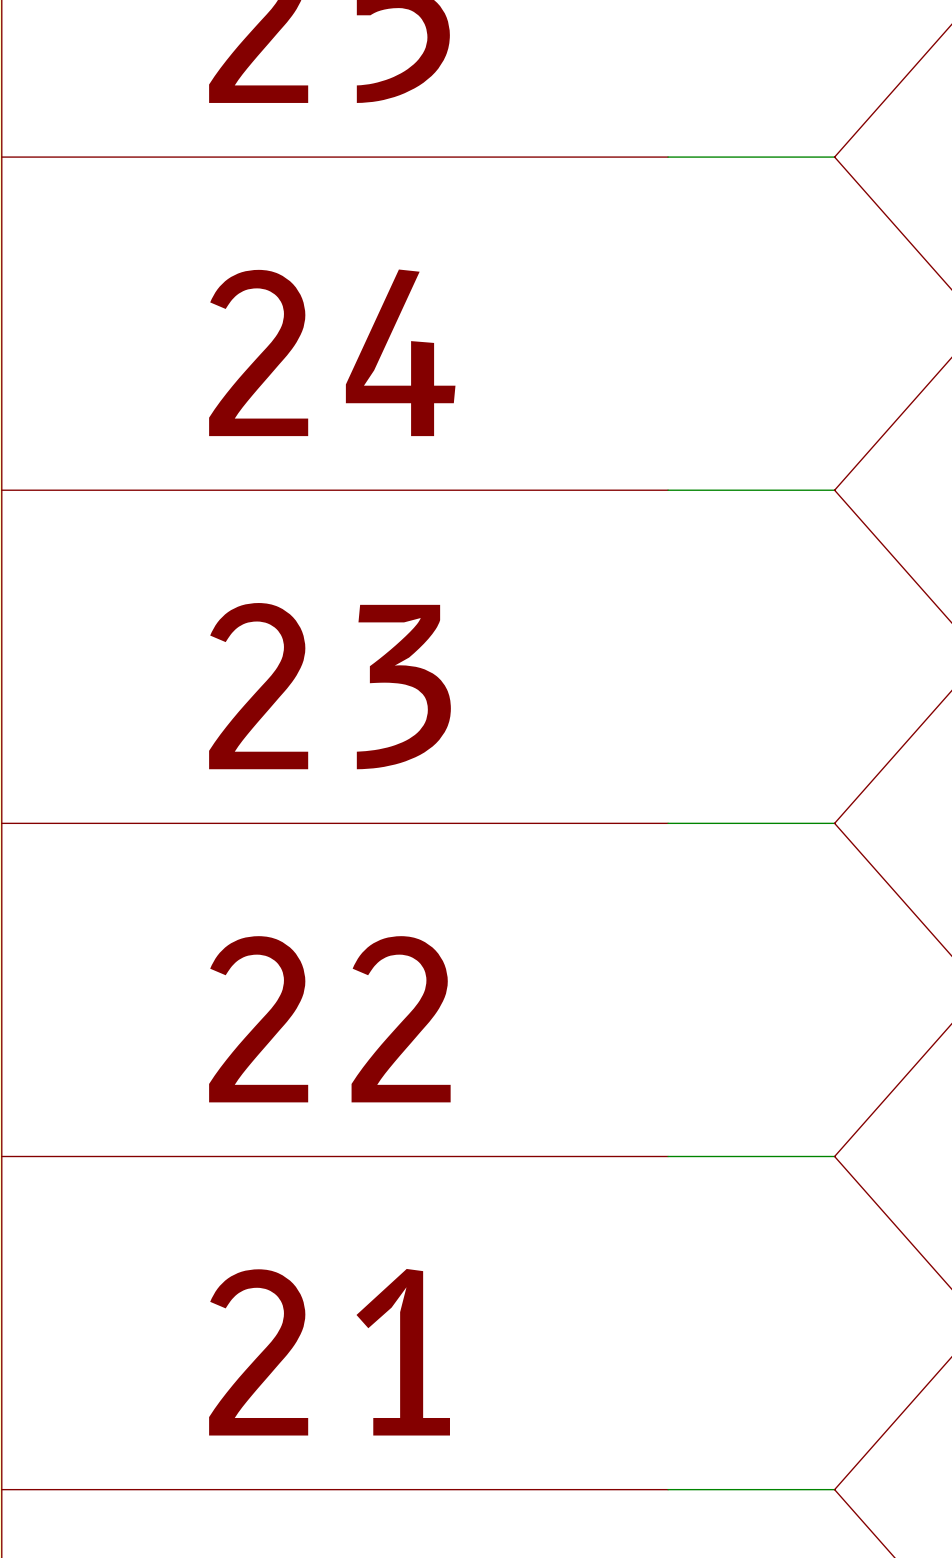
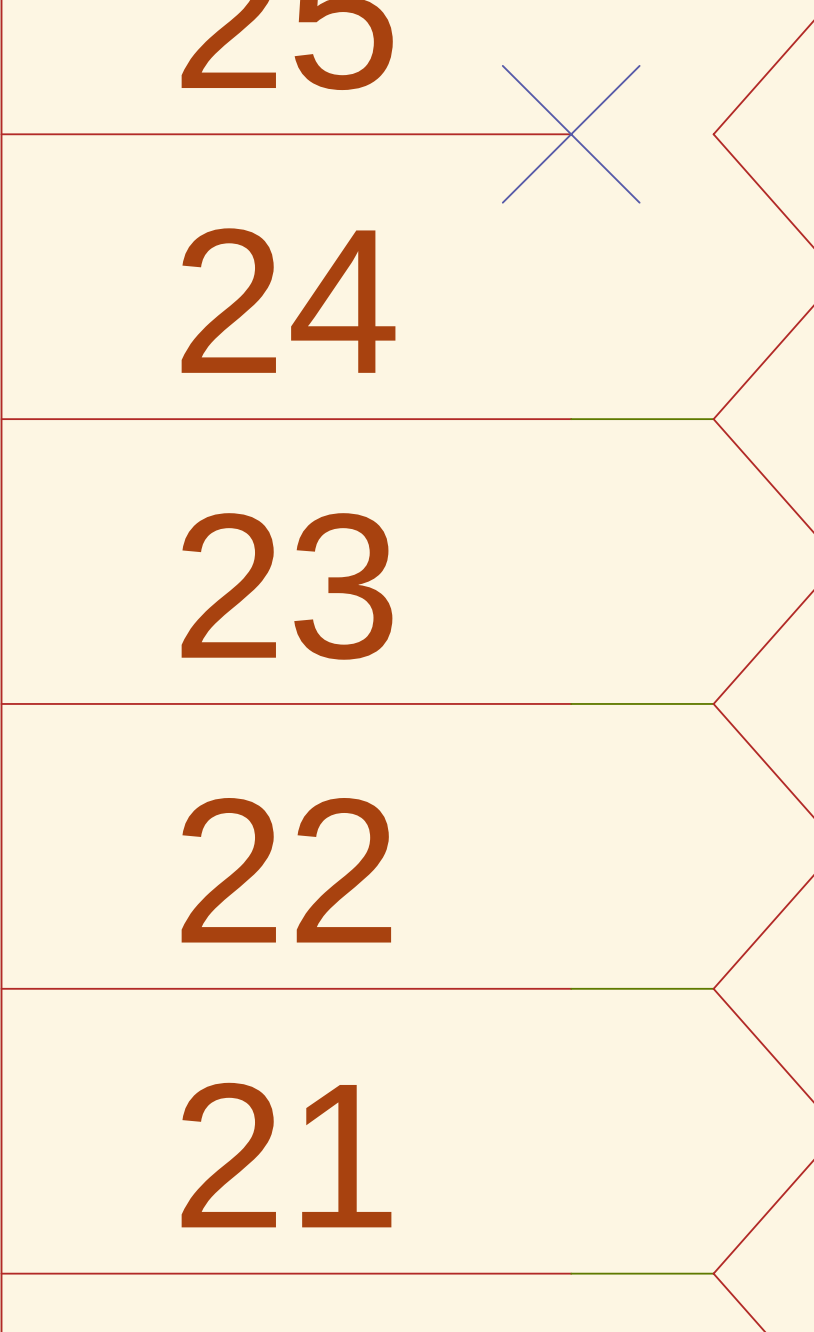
wire: (668, 157) (834, 157) -> none
no-connect mark: none -> (571, 134)

